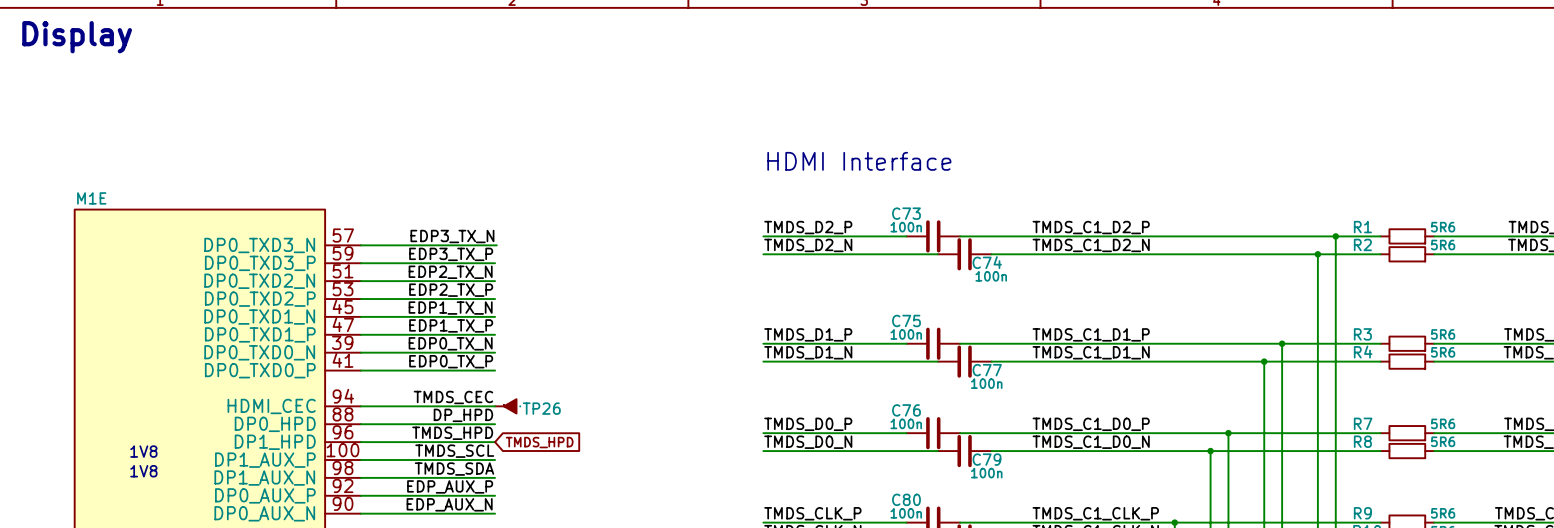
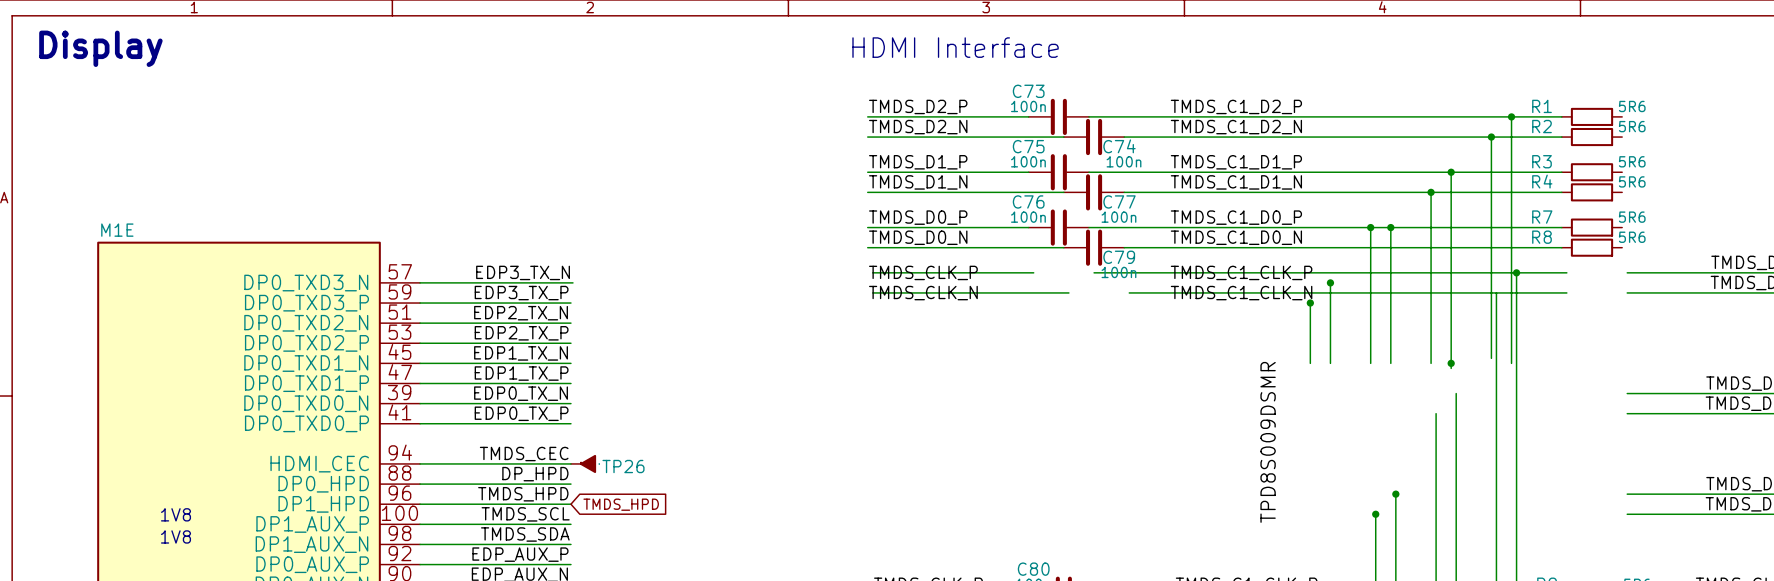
wire: none -> (867, 116) (1028, 116)
wire: none -> (1089, 116) (1561, 116)
wire: none -> (1511, 116) (1511, 363)
junction: none -> (1511, 116)
wire: none -> (867, 137) (1063, 137)
wire: none -> (1124, 137) (1561, 137)
wire: none -> (1491, 137) (1491, 358)
junction: none -> (1491, 137)
label: none -> TMDS_D1_P (918, 162)
label: none -> TMDS_C1_D1_P (1236, 162)
wire: none -> (867, 172) (1028, 172)
wire: none -> (1089, 172) (1561, 172)
wire: none -> (1451, 172) (1451, 368)
junction: none -> (1451, 172)
label: none -> TMDS_D1_N (918, 182)
label: none -> TMDS_C1_D1_N (1236, 182)
text position: HDMI Interface (859, 161) -> HDMI Interface (955, 47)
wire: none -> (867, 192) (1063, 192)
wire: none -> (1124, 192) (1561, 192)
wire: none -> (1431, 192) (1431, 363)
junction: none -> (1431, 192)
label: none -> TMDS_D0_P (918, 217)
label: none -> TMDS_C1_D0_P (1236, 217)
wire: none -> (1370, 227) (1370, 363)
junction: none -> (1370, 227)
wire: none -> (1390, 227) (1390, 363)
junction: none -> (1390, 227)
label: none -> TMDS_D0_N (918, 237)
label: none -> TMDS_C1_D0_N (1236, 237)
label position: TMDS_D2_P (808, 227) -> TMDS_D2_P (918, 106)
label position: TMDS_C1_D2_P (1091, 227) -> TMDS_C1_D2_P (1236, 106)
label: none -> TMDS_CLK_P (923, 272)
C73 position: (933, 236) -> (1058, 116)
label: none -> TMDS_C1_CLK_P (1241, 272)
R1 position: (1407, 236) -> (1592, 116)
label position: TMDS_D2_N (808, 245) -> TMDS_D2_N (918, 127)
label position: TMDS_C1_D2_N (1091, 245) -> TMDS_C1_D2_N (1236, 127)
wire: none -> (1330, 282) (1330, 363)
junction: none -> (1330, 282)
label: none -> TMDS_CLK_N (923, 293)
C74 position: (964, 254) -> (1094, 137)
label: none -> TMDS_C1_CLK_N (1241, 293)
junction: (1317, 254) -> none
R2 position: (1407, 254) -> (1592, 137)
wire: none -> (1310, 303) (1310, 363)
junction: none -> (1310, 303)
junction: none -> (1451, 363)
label: TMDS_D1_P (808, 334) -> none
label: TMDS_C1_D1_P (1091, 334) -> none
wire: (763, 343) (906, 343) -> (867, 227) (1028, 227)
C75 position: (933, 343) -> (1058, 172)
wire: (960, 343) (1380, 343) -> (1089, 227) (1561, 227)
junction: (1282, 343) -> none
R3 position: (1407, 343) -> (1592, 172)
label: TMDS_D1_N (808, 352) -> none
label: TMDS_C1_D1_N (1091, 352) -> none
wire: (763, 361) (937, 361) -> (867, 247) (1063, 247)
C77 position: (964, 361) -> (1094, 192)
wire: (991, 361) (1380, 361) -> (1124, 247) (1561, 247)
junction: (1264, 361) -> none
R4 position: (1407, 361) -> (1592, 192)
label: none -> TPD8S009DSMR (1268, 442)
label: TMDS_D0_P (808, 424) -> none
label: TMDS_C1_D0_P (1091, 424) -> none
wire: (763, 433) (906, 433) -> none
C76 position: (933, 433) -> (1058, 227)
wire: (960, 433) (1380, 433) -> none
R7 position: (1407, 433) -> (1592, 227)
label: TMDS_D0_N (808, 442) -> none
label: TMDS_C1_D0_N (1091, 442) -> none
wire: (763, 451) (937, 451) -> none
C79 position: (964, 451) -> (1094, 247)
wire: (991, 451) (1380, 451) -> none
R8 position: (1407, 451) -> (1592, 247)

